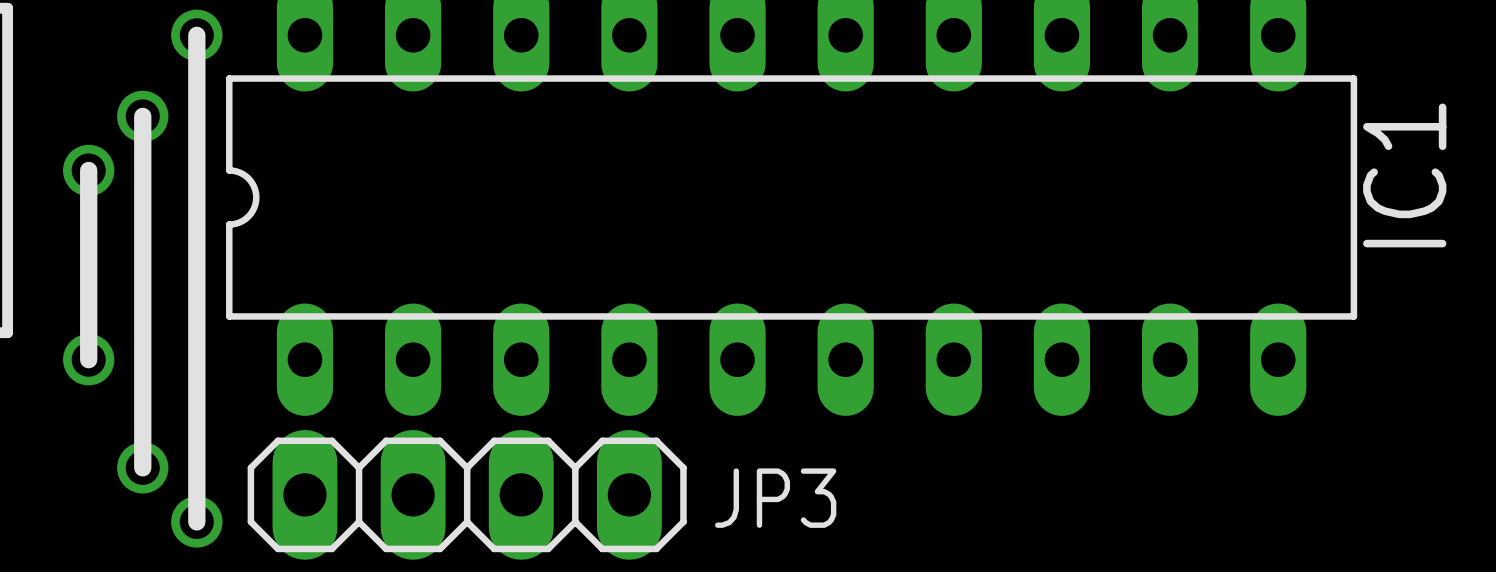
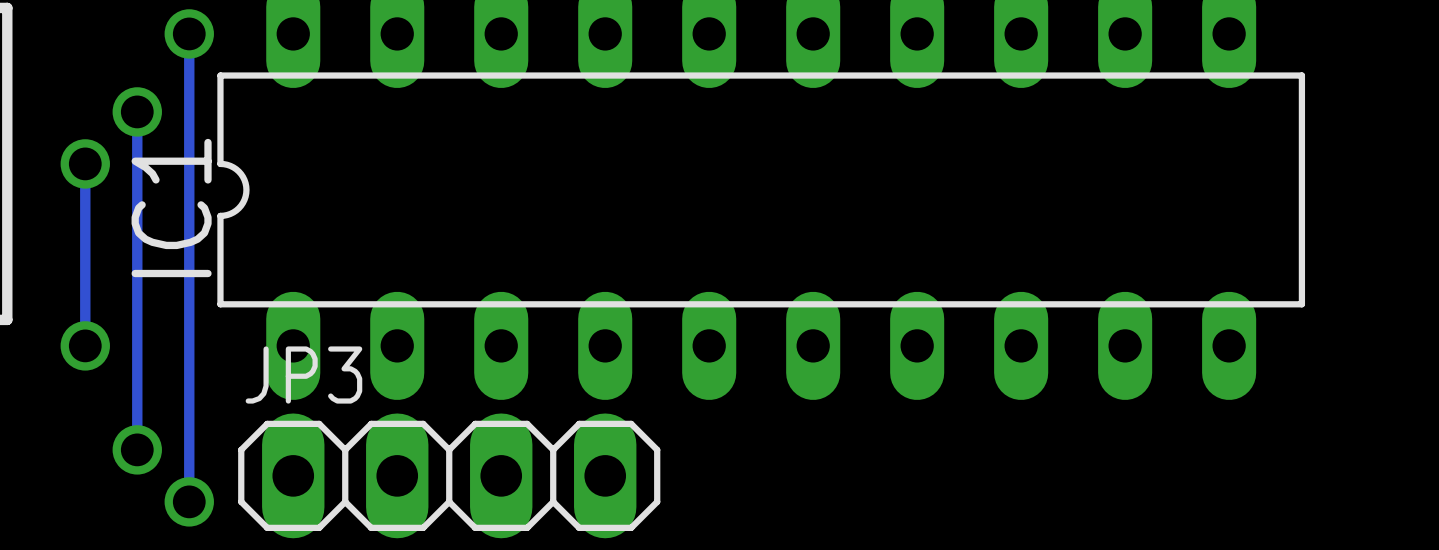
line: (196, 35) (196, 521) -> none
line: (142, 116) (142, 467) -> none
line: (88, 170) (88, 359) -> none
IC1 name position: IC1 (1404, 175) -> IC1 (171, 208)
JP3 name position: JP3 (775, 498) -> JP3 (303, 375)

